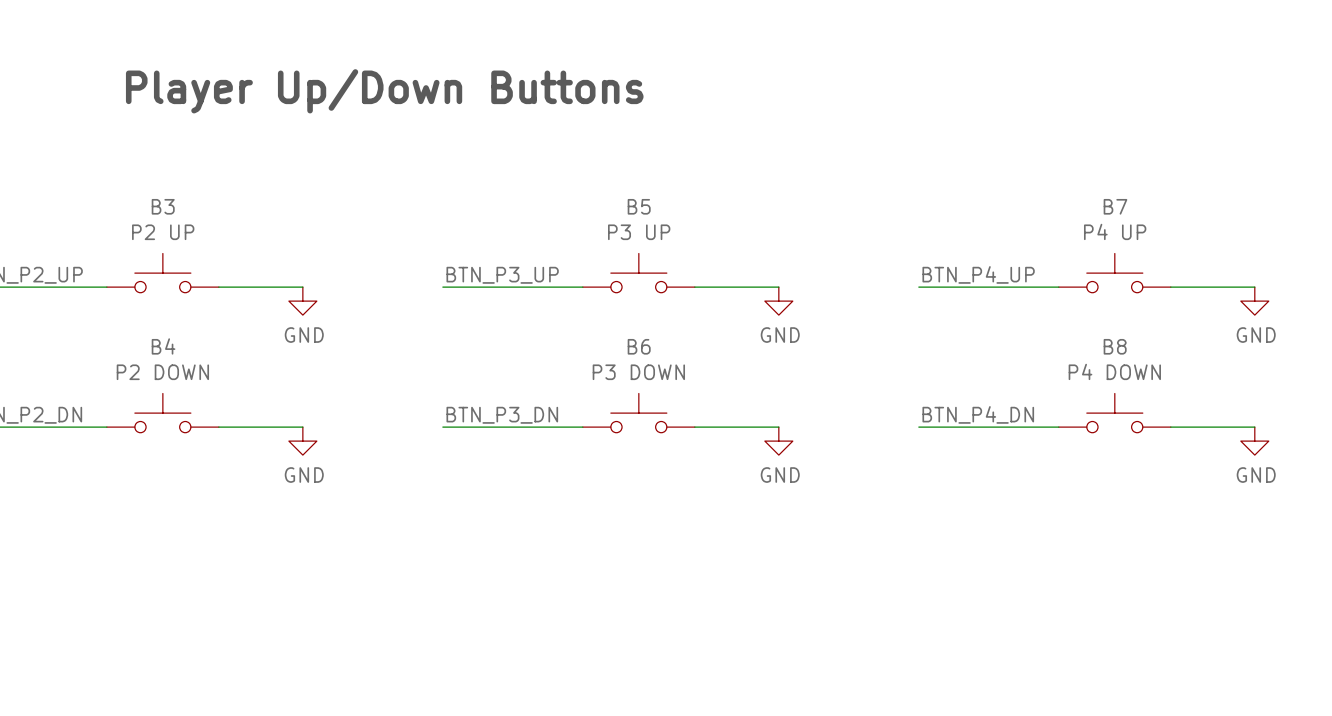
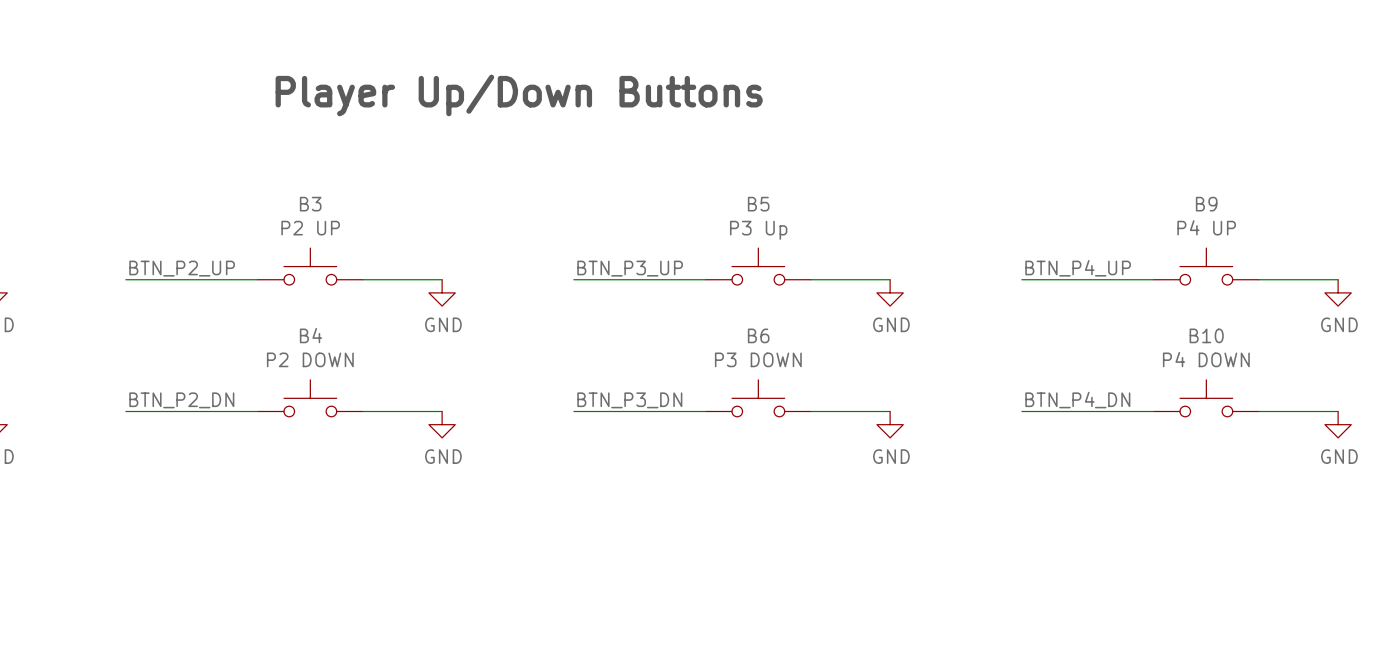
B7 name: B7 (1115, 206) -> B9 (1206, 204)
B5 value: P3 UP (639, 232) -> P3 Up (758, 230)
B8 name: B8 (1115, 346) -> B10 (1206, 335)

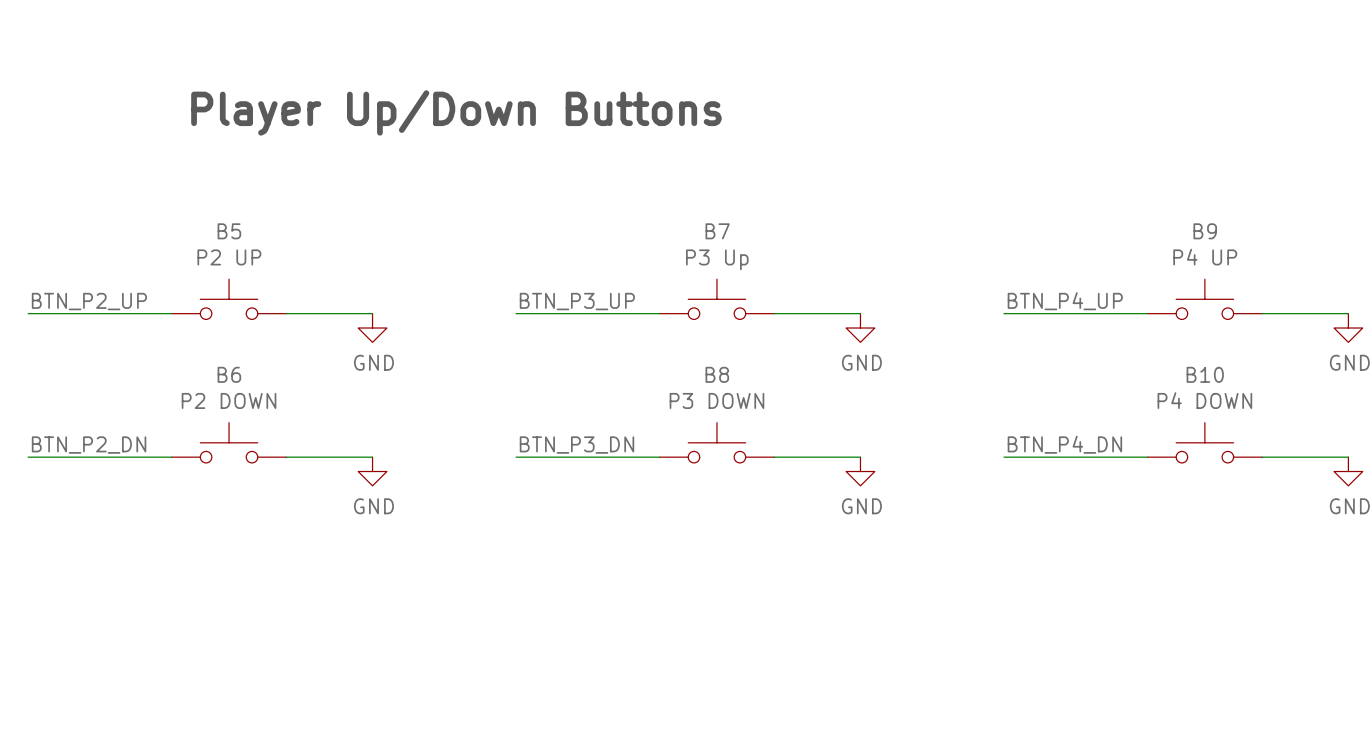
B3 name: B3 (310, 204) -> B5 (229, 231)
B5 name: B5 (758, 204) -> B7 (717, 231)
B4 name: B4 (310, 335) -> B6 (229, 374)
B6 name: B6 (758, 335) -> B8 (717, 374)

